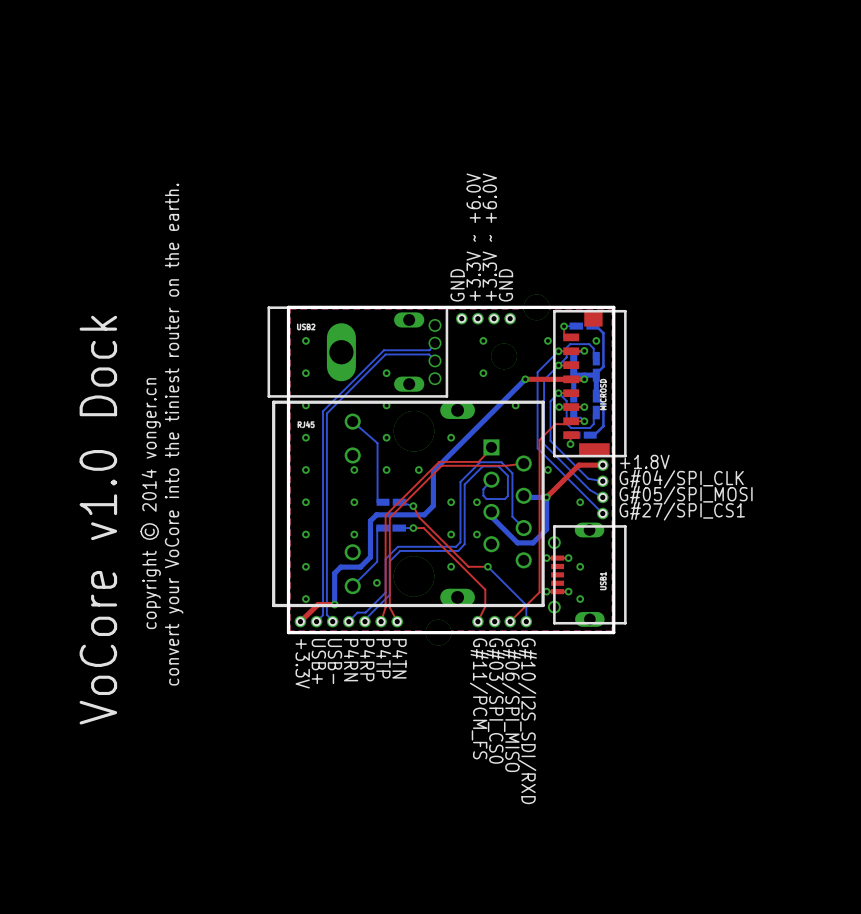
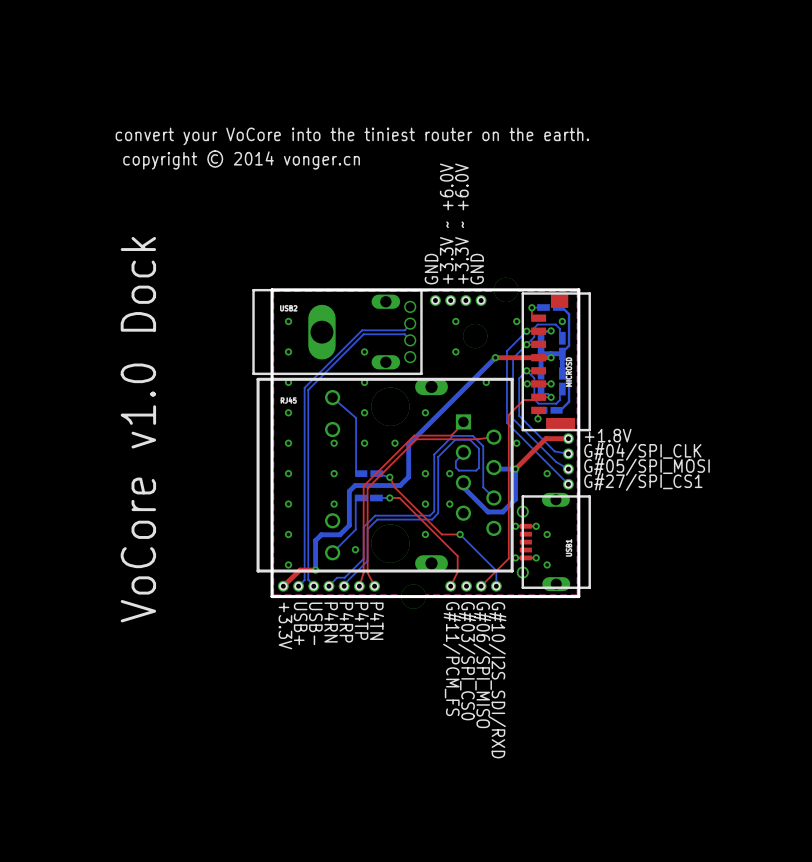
text: none -> convert your VoCore into the tiniest router on the earth. (352, 136)
text: none -> copyright © 2014 vonger.cn (241, 159)
text: convert your VoCore into the tiniest router on the earth. (174, 434) -> none
text: copyright © 2014 vonger.cn (150, 503) -> none
text position: VoCore v1.0 Dock (98, 520) -> VoCore v1.0 Dock (138, 429)

